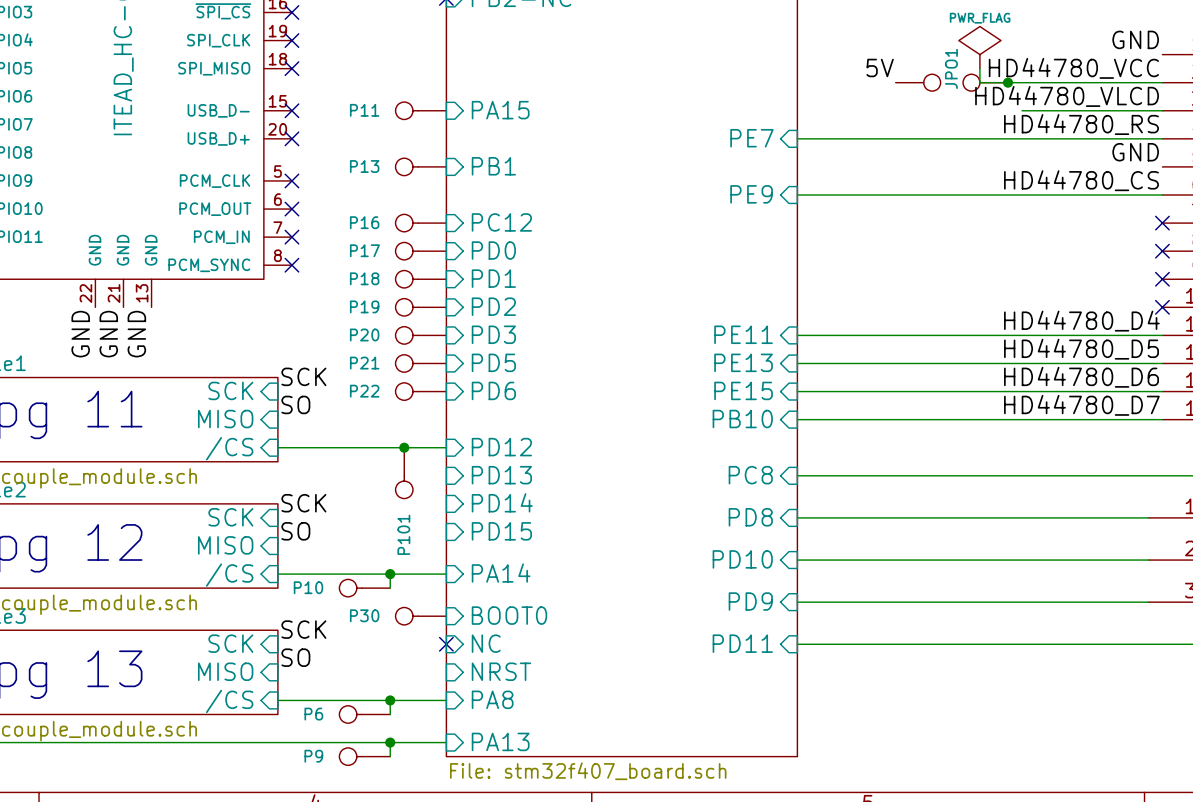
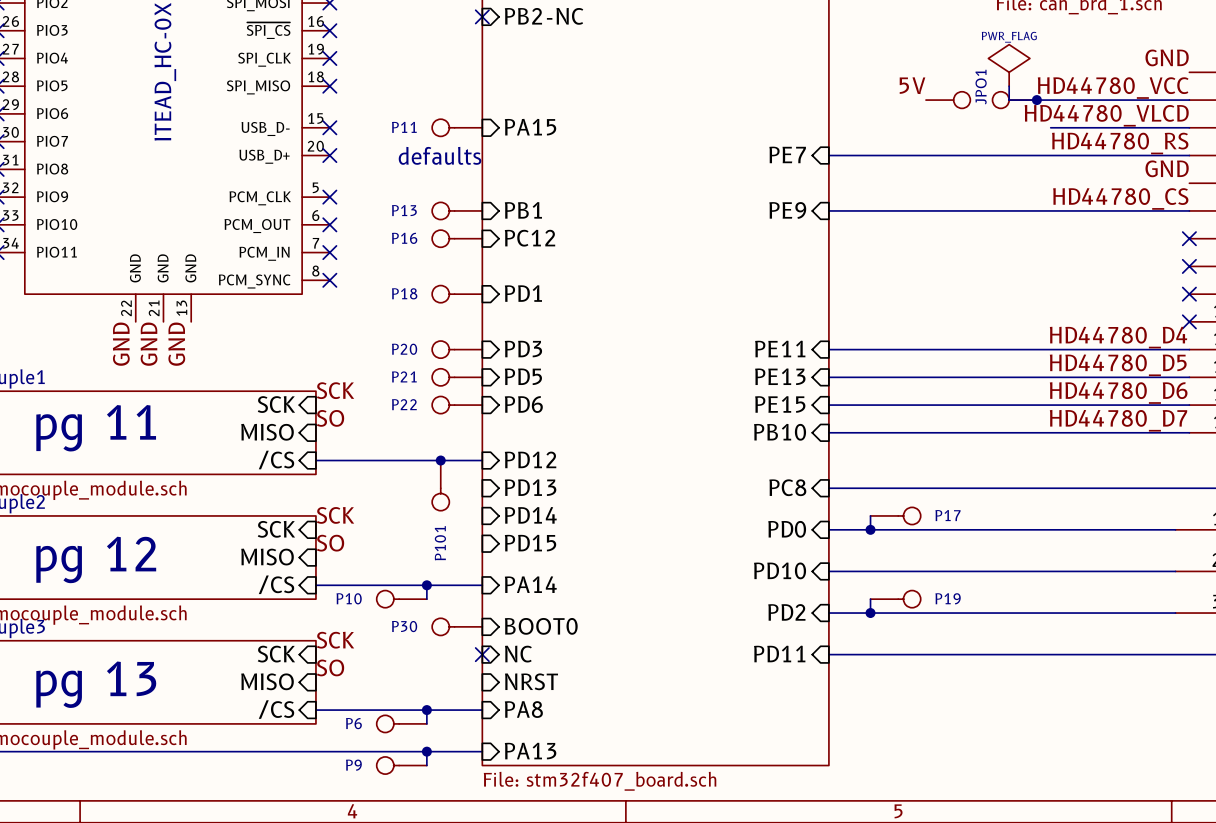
text: none -> defaults (440, 155)
P13 position: (420, 166) -> (457, 210)
sheet pin position: PB1 (493, 166) -> PB1 (523, 210)
sheet pin: PD0 (493, 250) -> none
P17 rotation: 0° (406, 251) -> 180° (909, 515)
P17 position: (420, 251) -> (895, 515)
sheet pin: PD2 (493, 306) -> none
P19 rotation: 0° (406, 307) -> 180° (909, 599)
P19 position: (420, 307) -> (895, 599)
wire: none -> (870, 515) (870, 529)
sheet pin: PD8 (750, 517) -> PD0 (787, 529)
junction: none -> (870, 529)
wire: none -> (870, 599) (870, 613)
sheet pin: PD9 (750, 601) -> PD2 (786, 612)
junction: none -> (870, 613)

